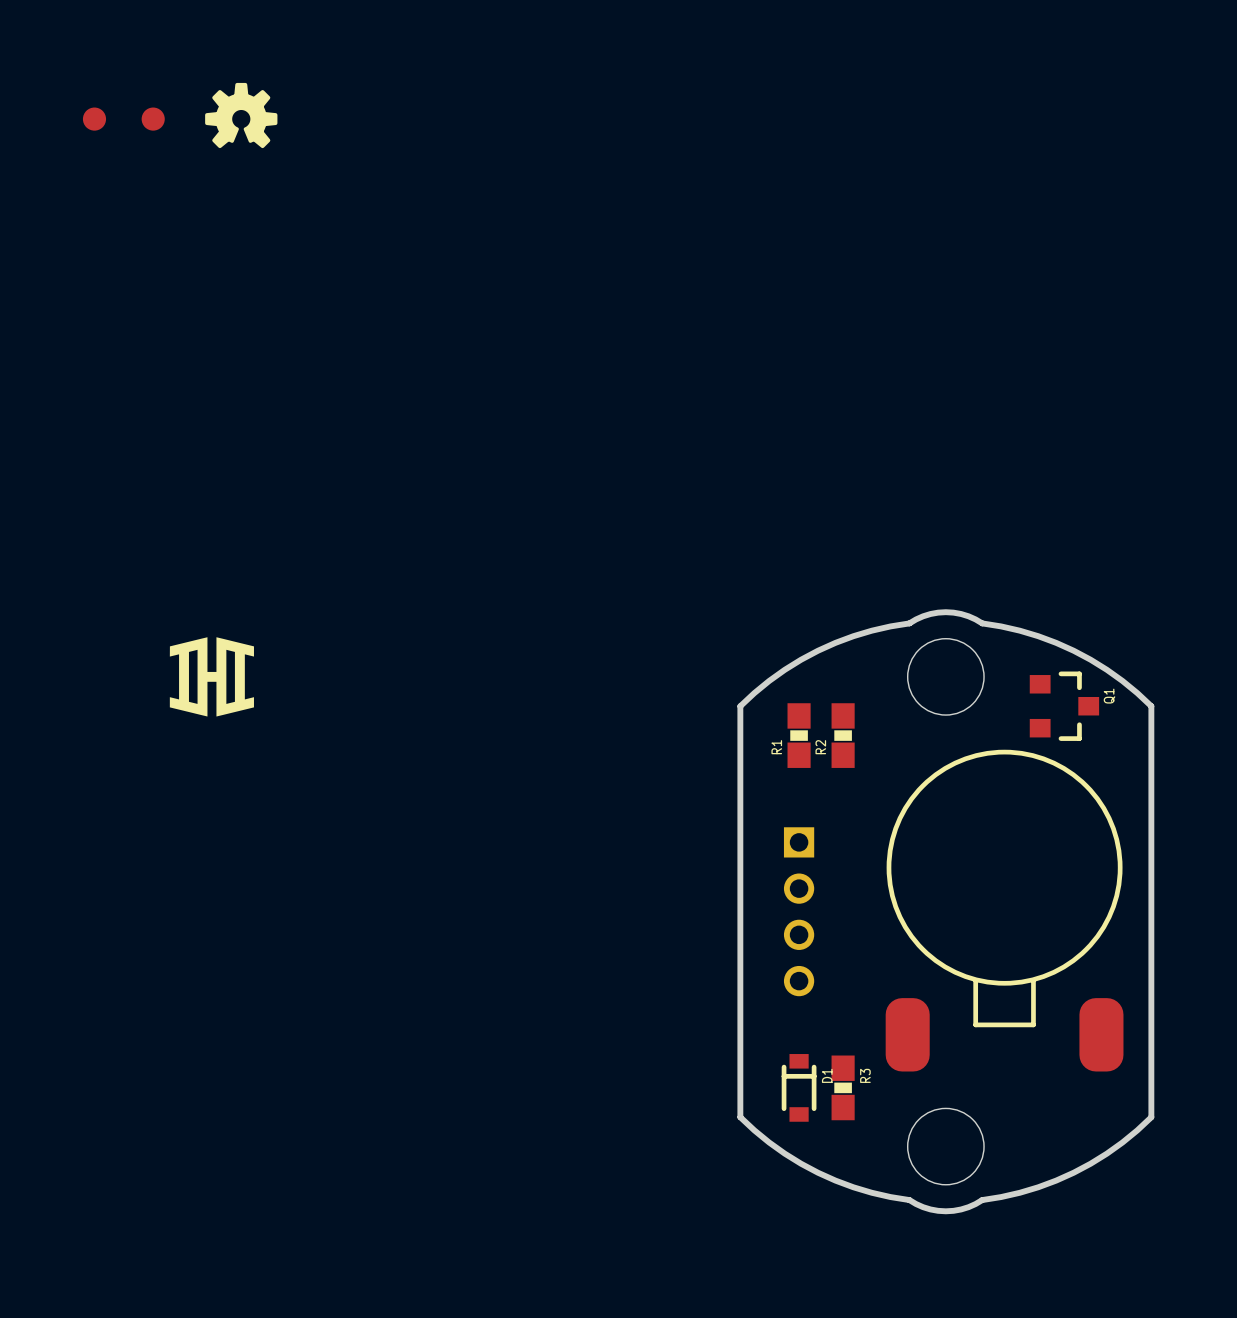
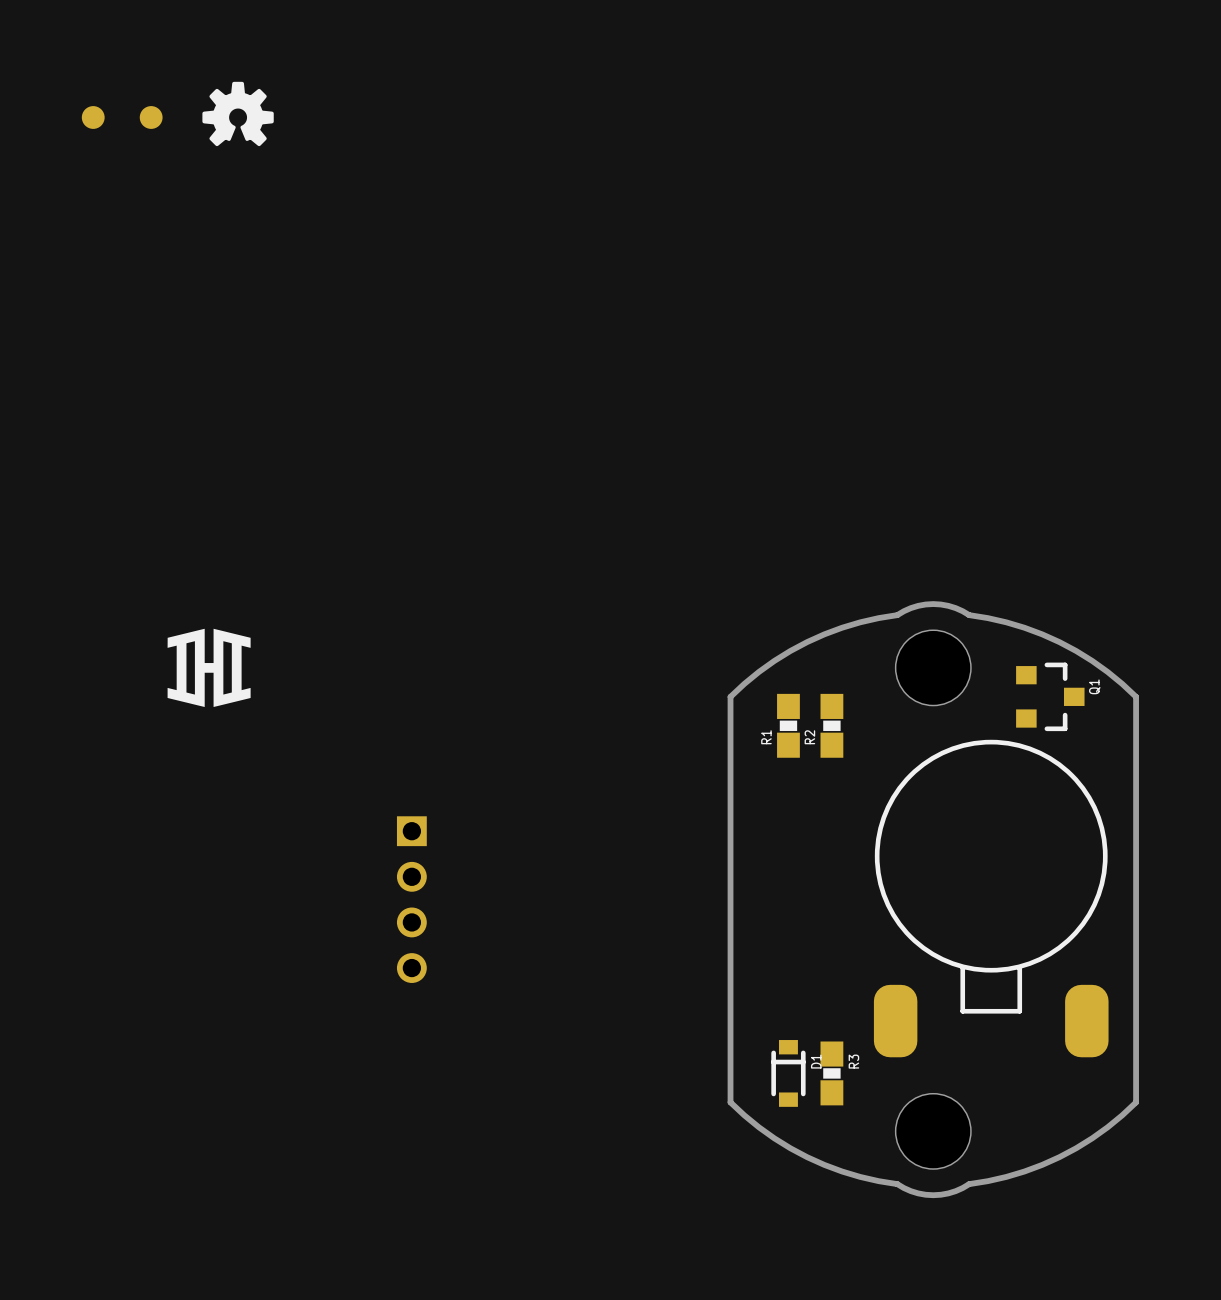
part position: (799, 911) -> (411, 899)

